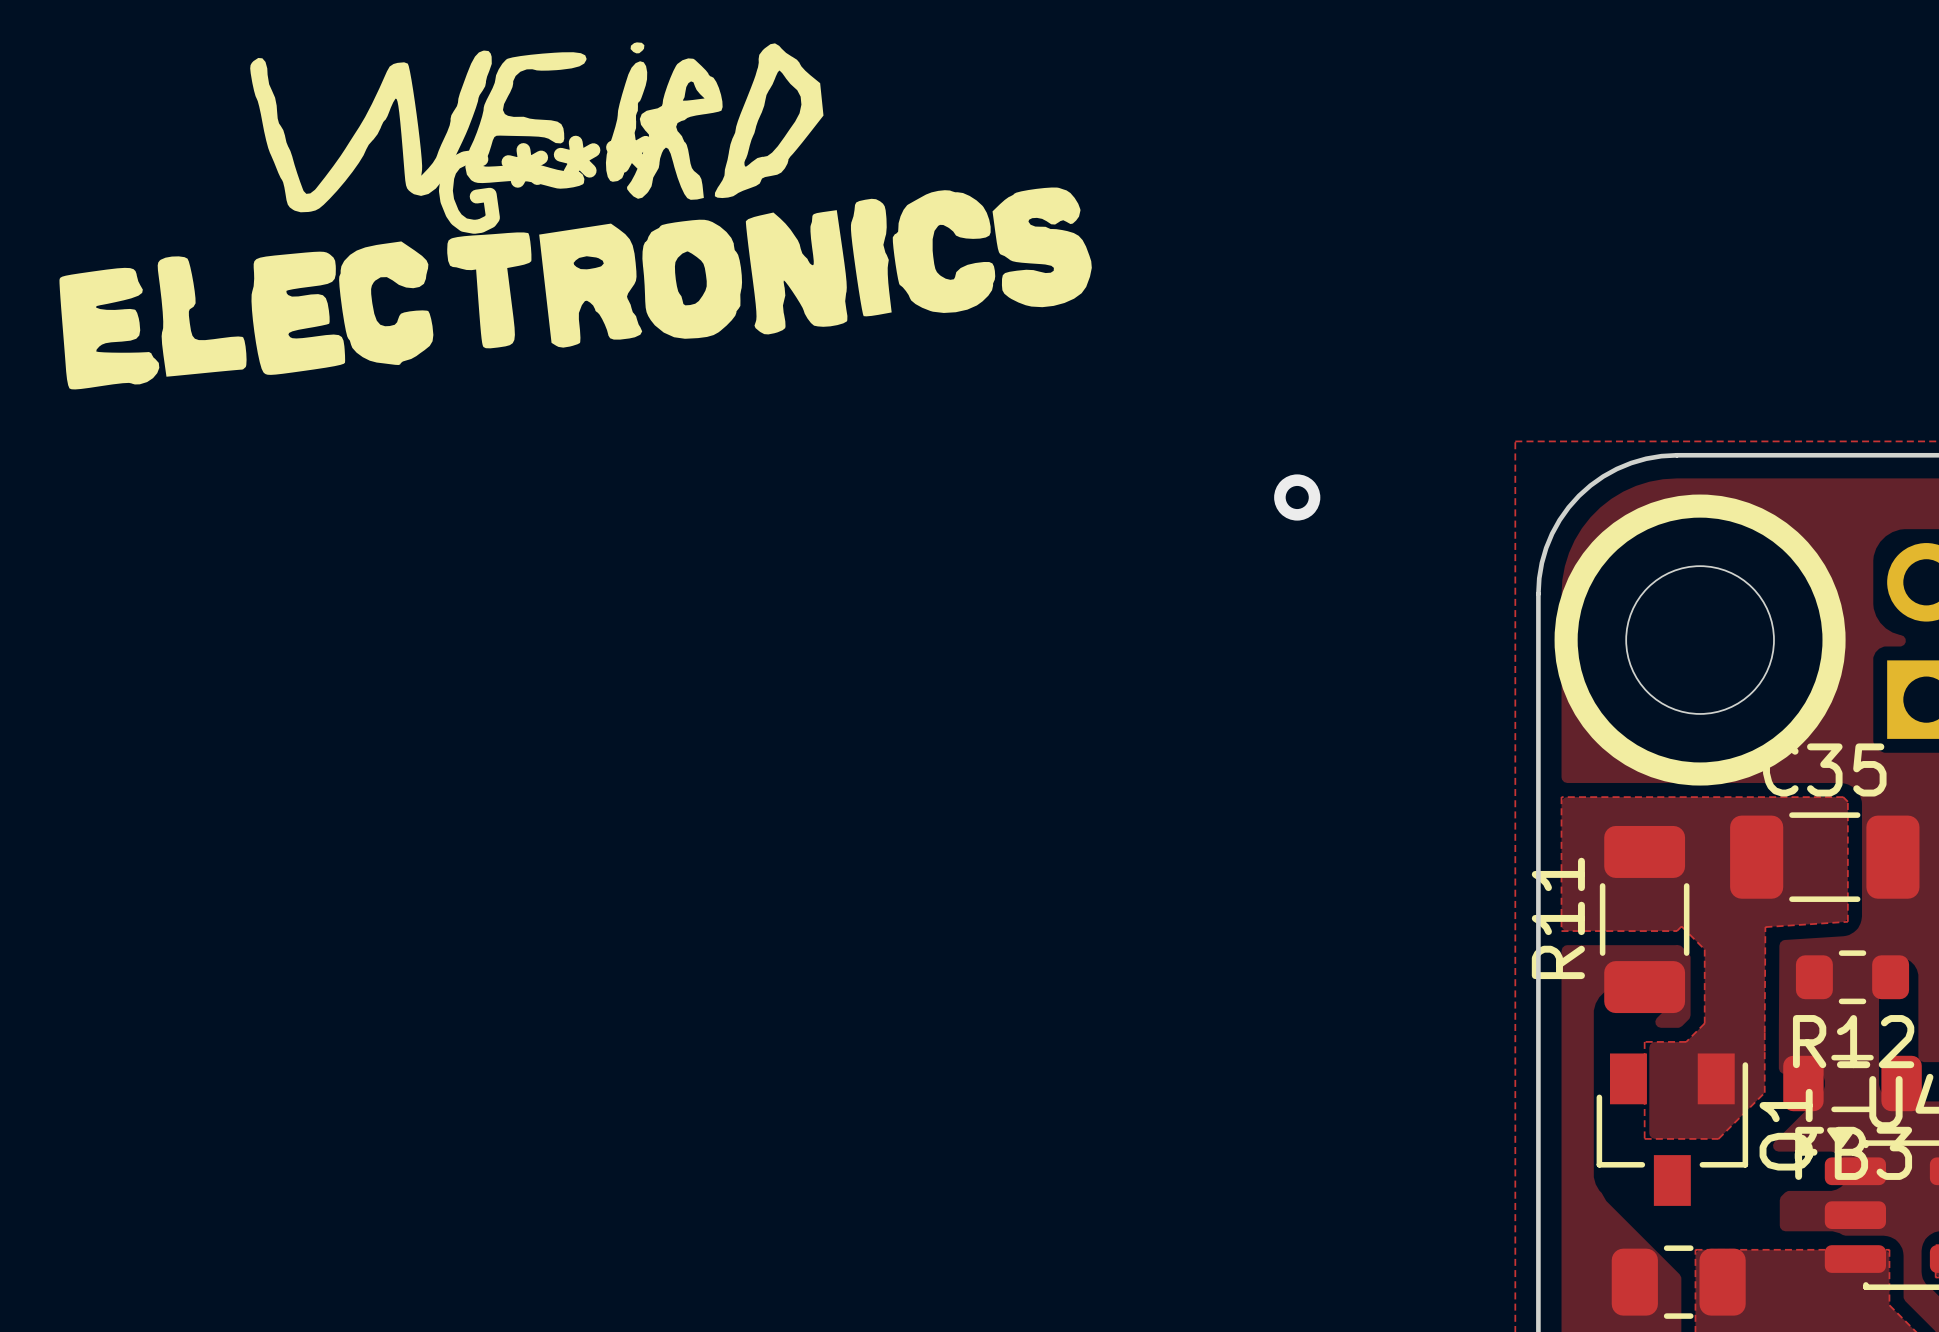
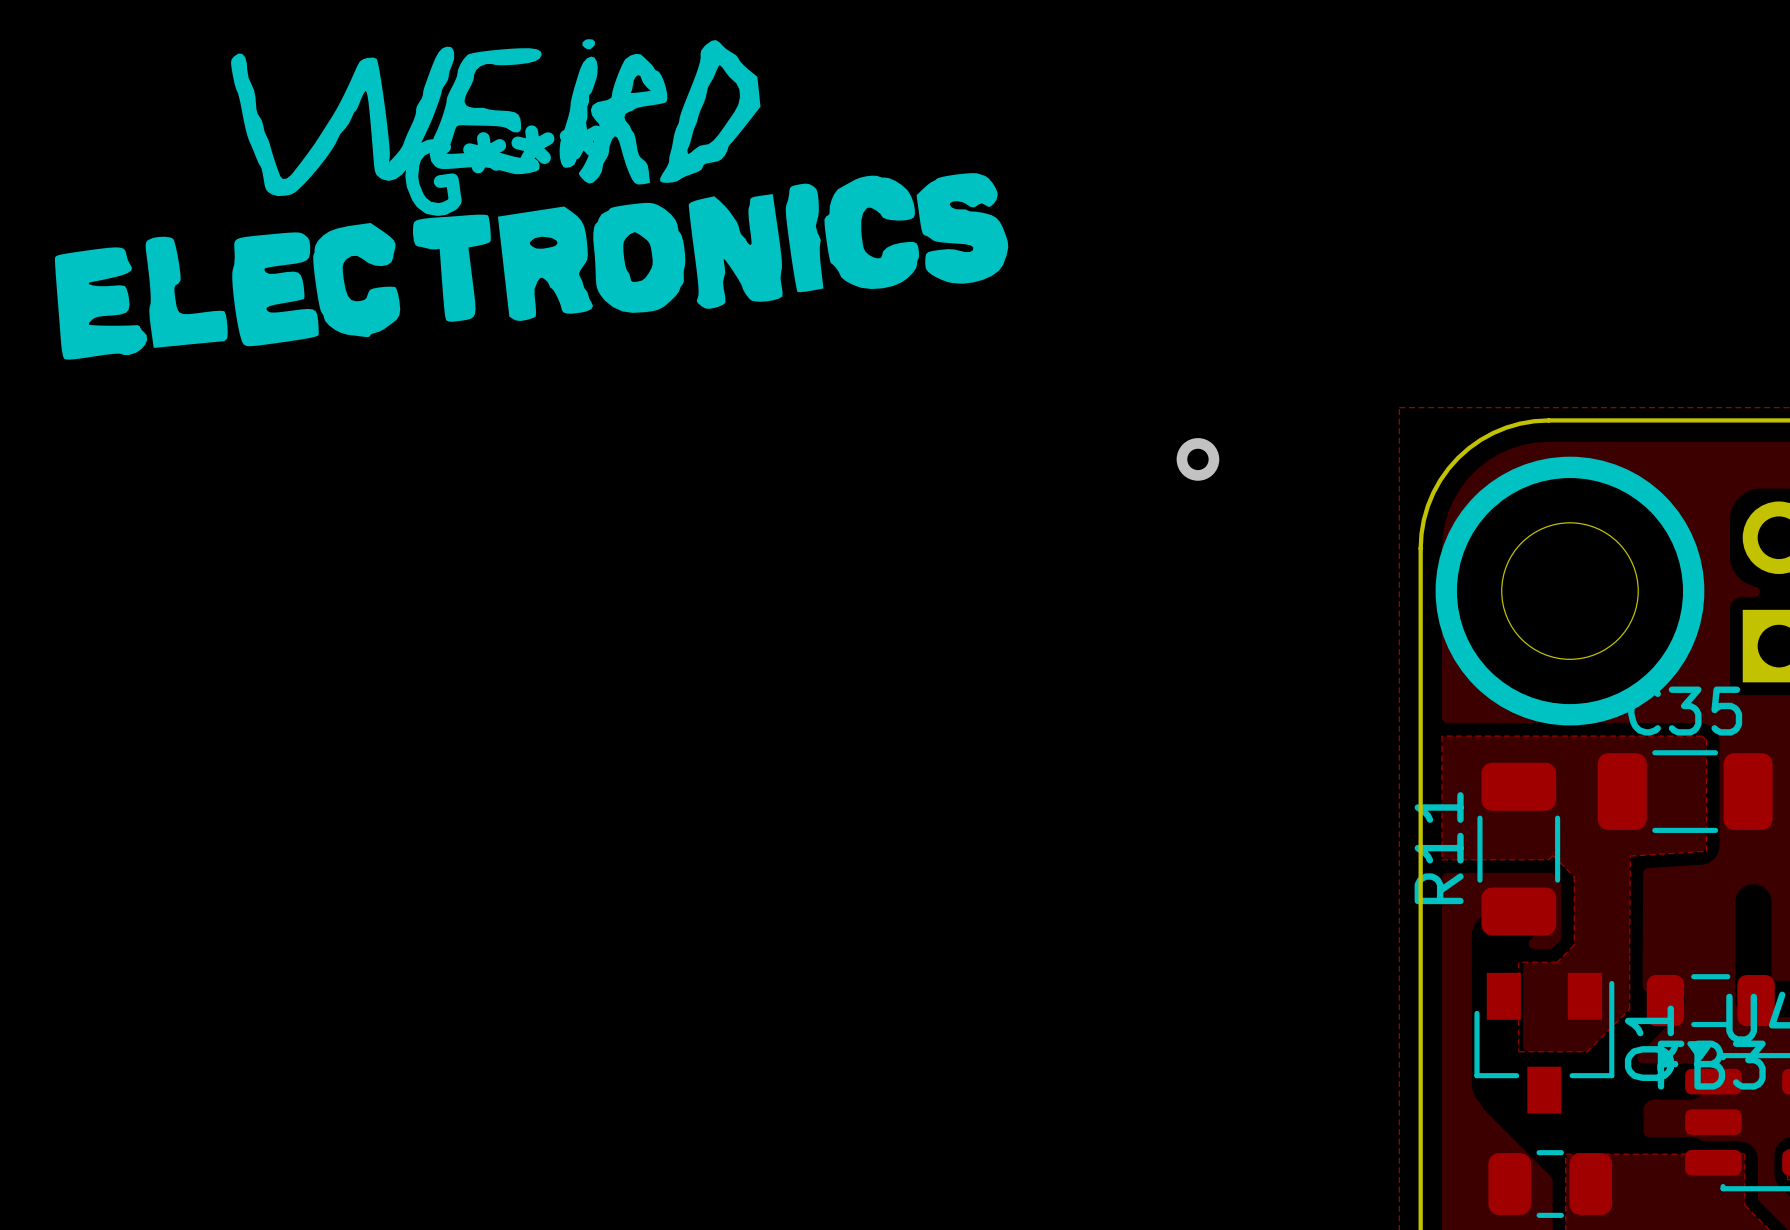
R12: (1852, 977) -> none

